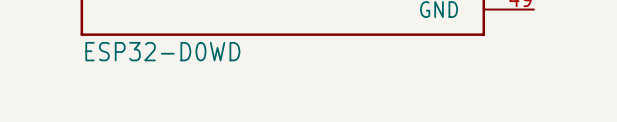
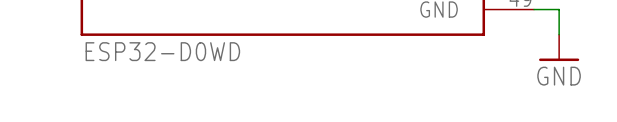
wire: none -> (534, 9) (559, 9) (559, 34)
power symbol: none -> GND (559, 47)

